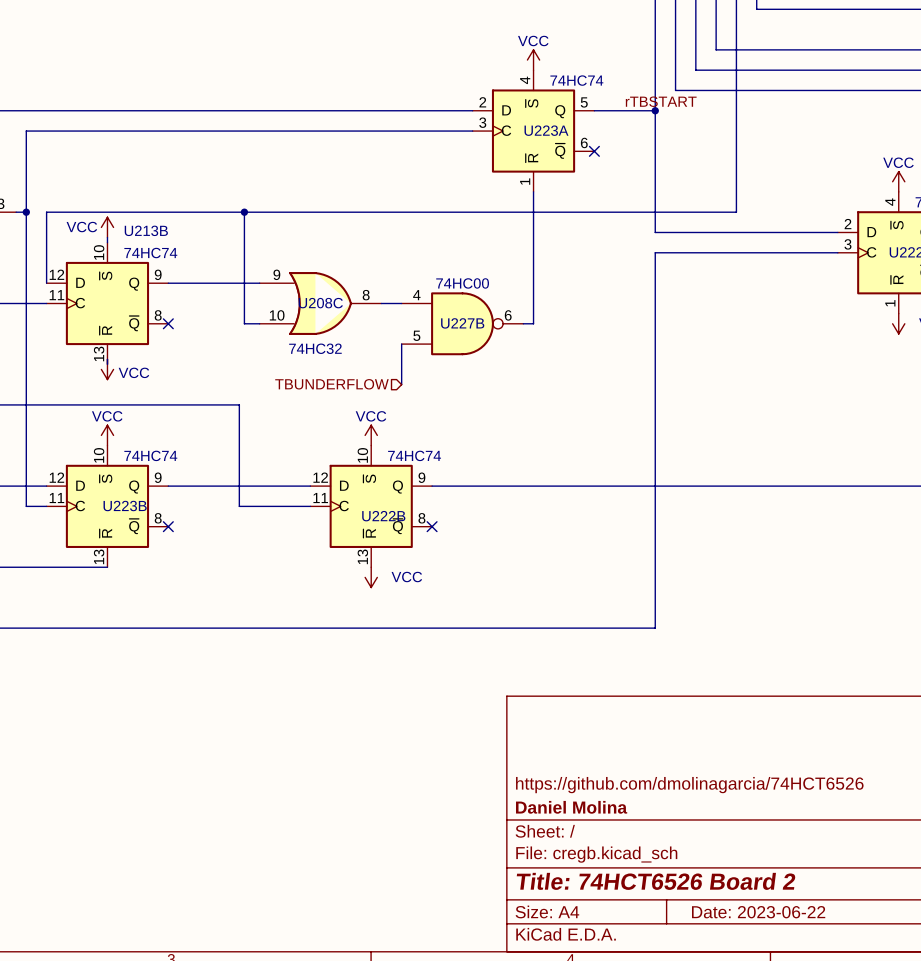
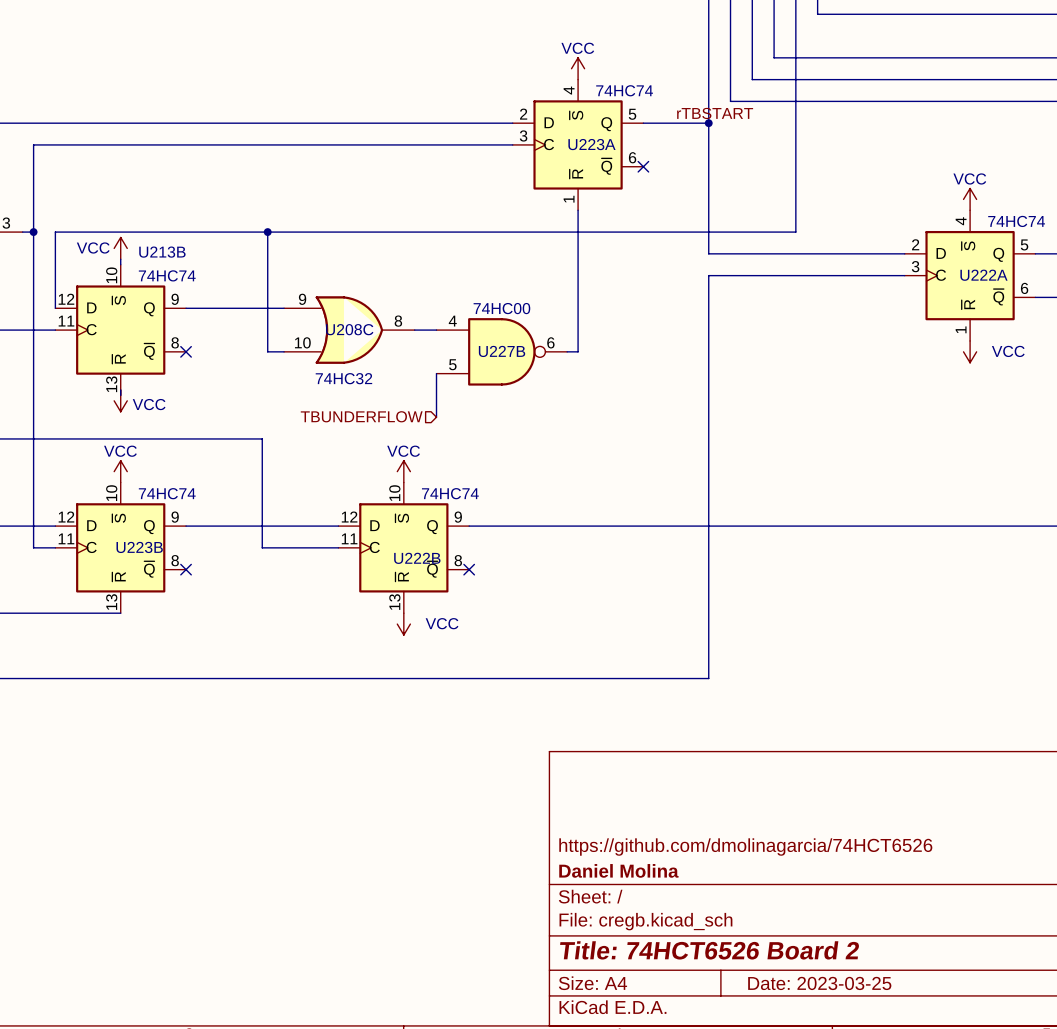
title block: Date: 2023-06-22 (758, 912) -> Date: 2023-03-25 (819, 983)

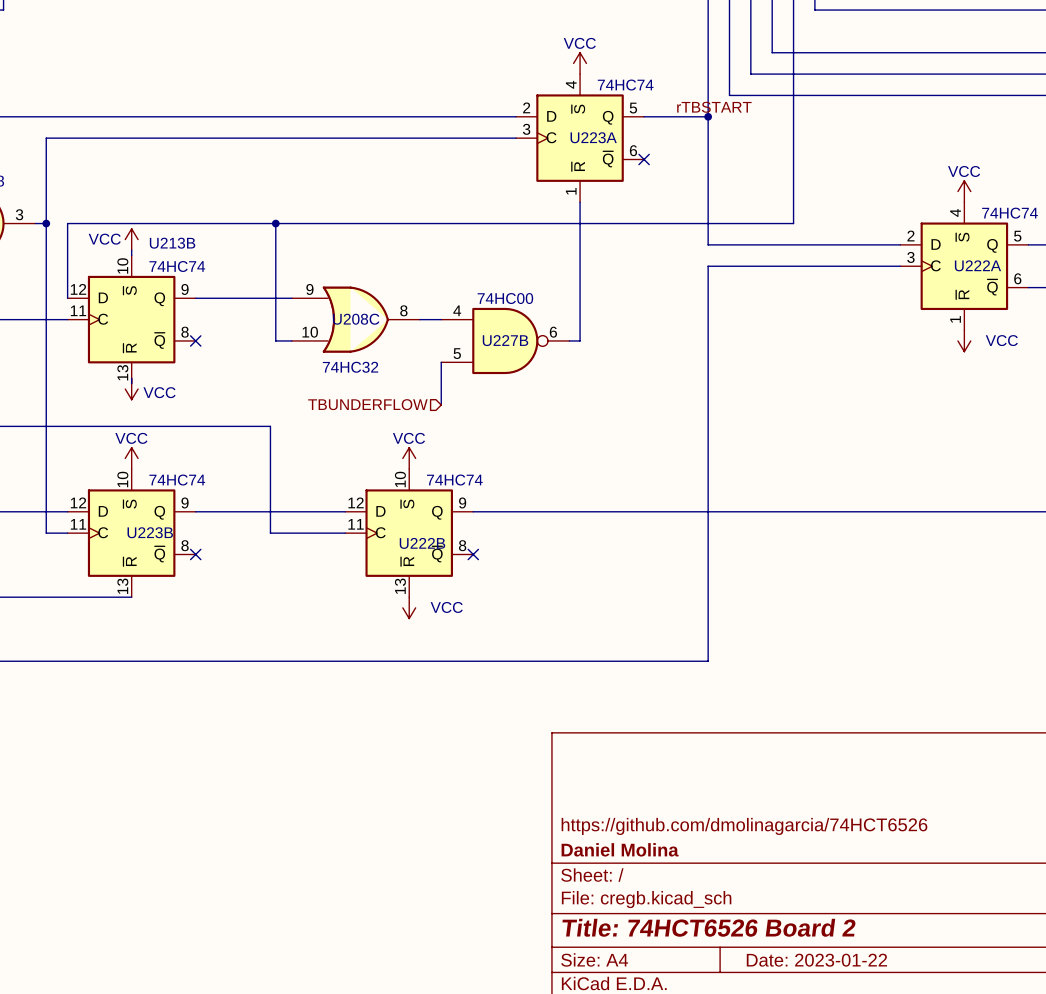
title block: Date: 2023-03-25 (819, 983) -> Date: 2023-01-22 (816, 960)

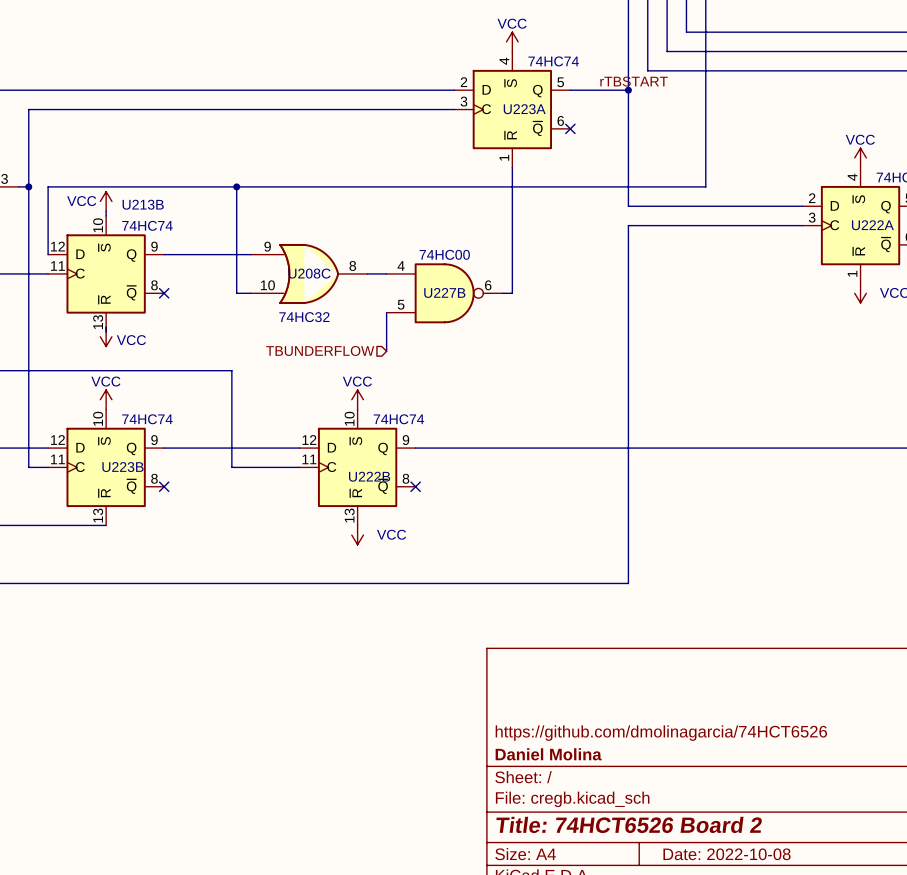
title block: Date: 2023-01-22 (816, 960) -> Date: 2022-10-08 (727, 854)

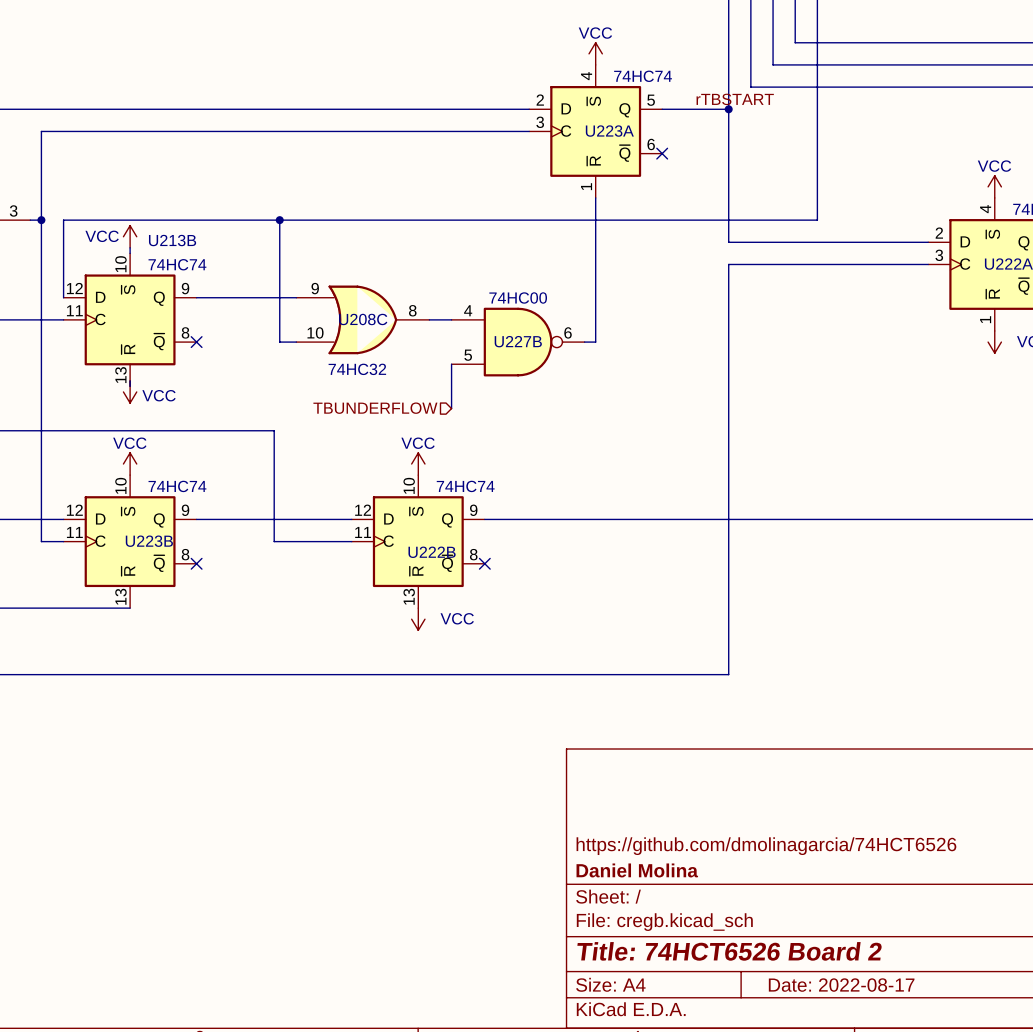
title block: Date: 2022-10-08 (727, 854) -> Date: 2022-08-17 (841, 985)

